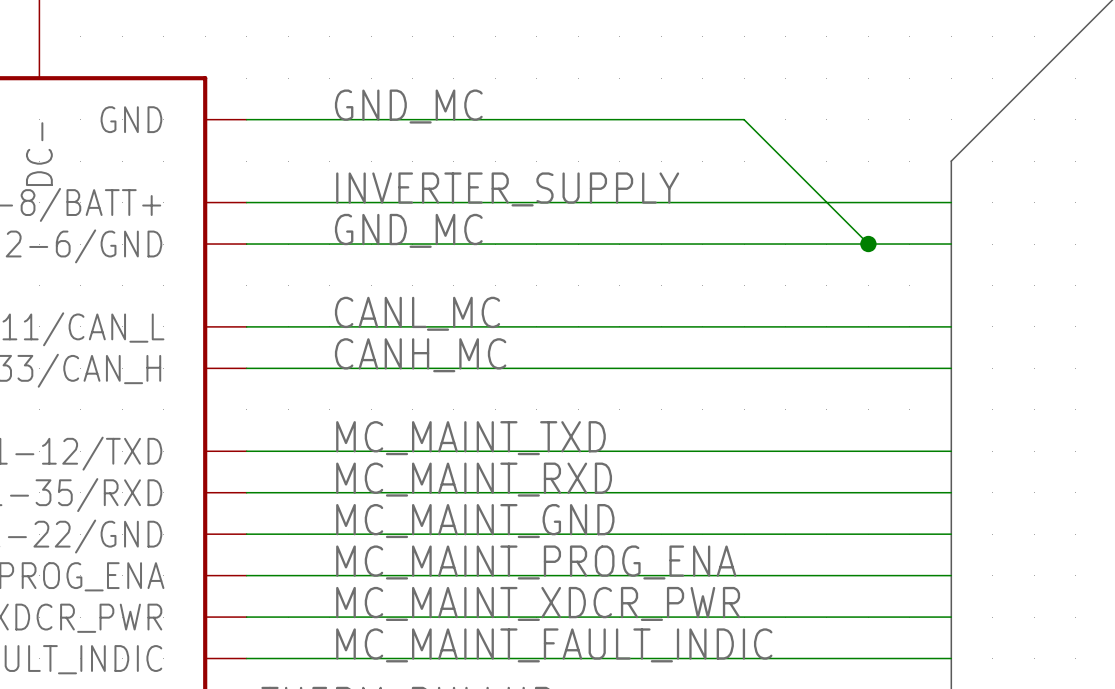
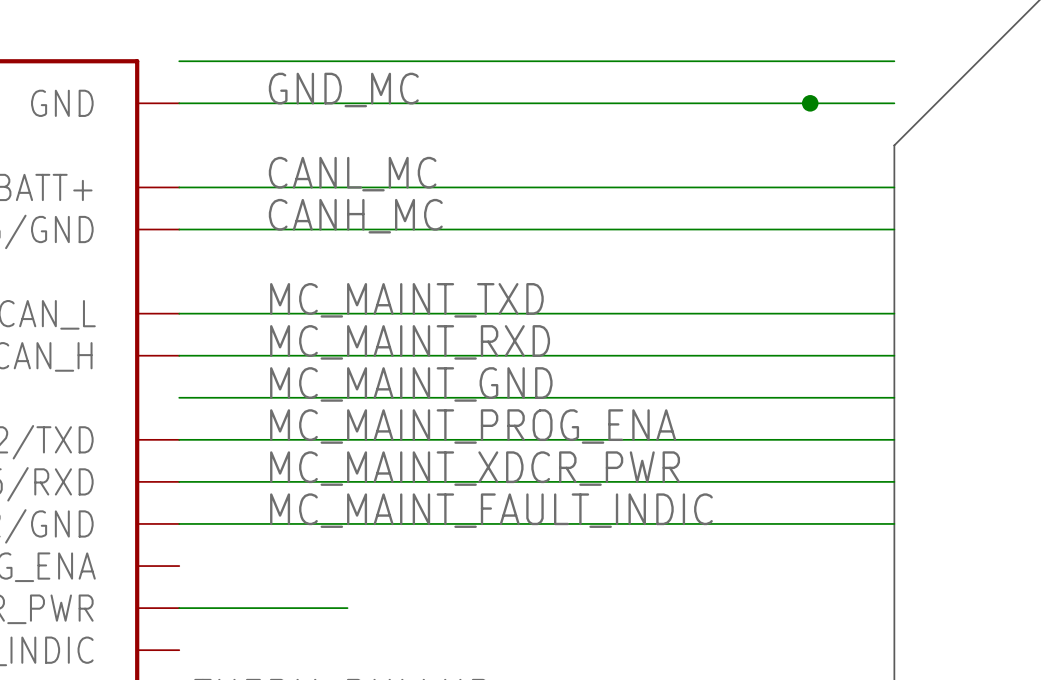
wire: none -> (179, 61) (894, 61)
wire: (744, 119) (868, 244) -> (684, 103) (894, 103)
junction: none -> (810, 103)
label: INVERTER_SUPPLY (507, 189) -> CANL_MC (352, 174)
label: GND_MC (408, 230) -> CANH_MC (355, 216)
junction: (868, 244) -> none
label: CANL_MC (417, 313) -> MC_MAINT_TXD (406, 300)
label: CANH_MC (420, 355) -> MC_MAINT_RXD (410, 342)
label: none -> MC_MAINT_GND (411, 384)
label: MC_MAINT_TXD (470, 438) -> MC_MAINT_PROG_ENA (473, 426)
label: MC_MAINT_RXD (474, 479) -> MC_MAINT_XDCR_PWR (475, 468)
label: MC_MAINT_GND (475, 521) -> MC_MAINT_FAULT_INDIC (491, 510)
label: MC_MAINT_PROG_ENA (536, 562) -> none
wire: (246, 575) (951, 575) -> (179, 397) (894, 397)
label: MC_MAINT_XDCR_PWR (538, 603) -> none
wire: (412, 617) (951, 617) -> none
label: MC_MAINT_FAULT_INDIC (554, 645) -> none
wire: (246, 658) (951, 658) -> none

